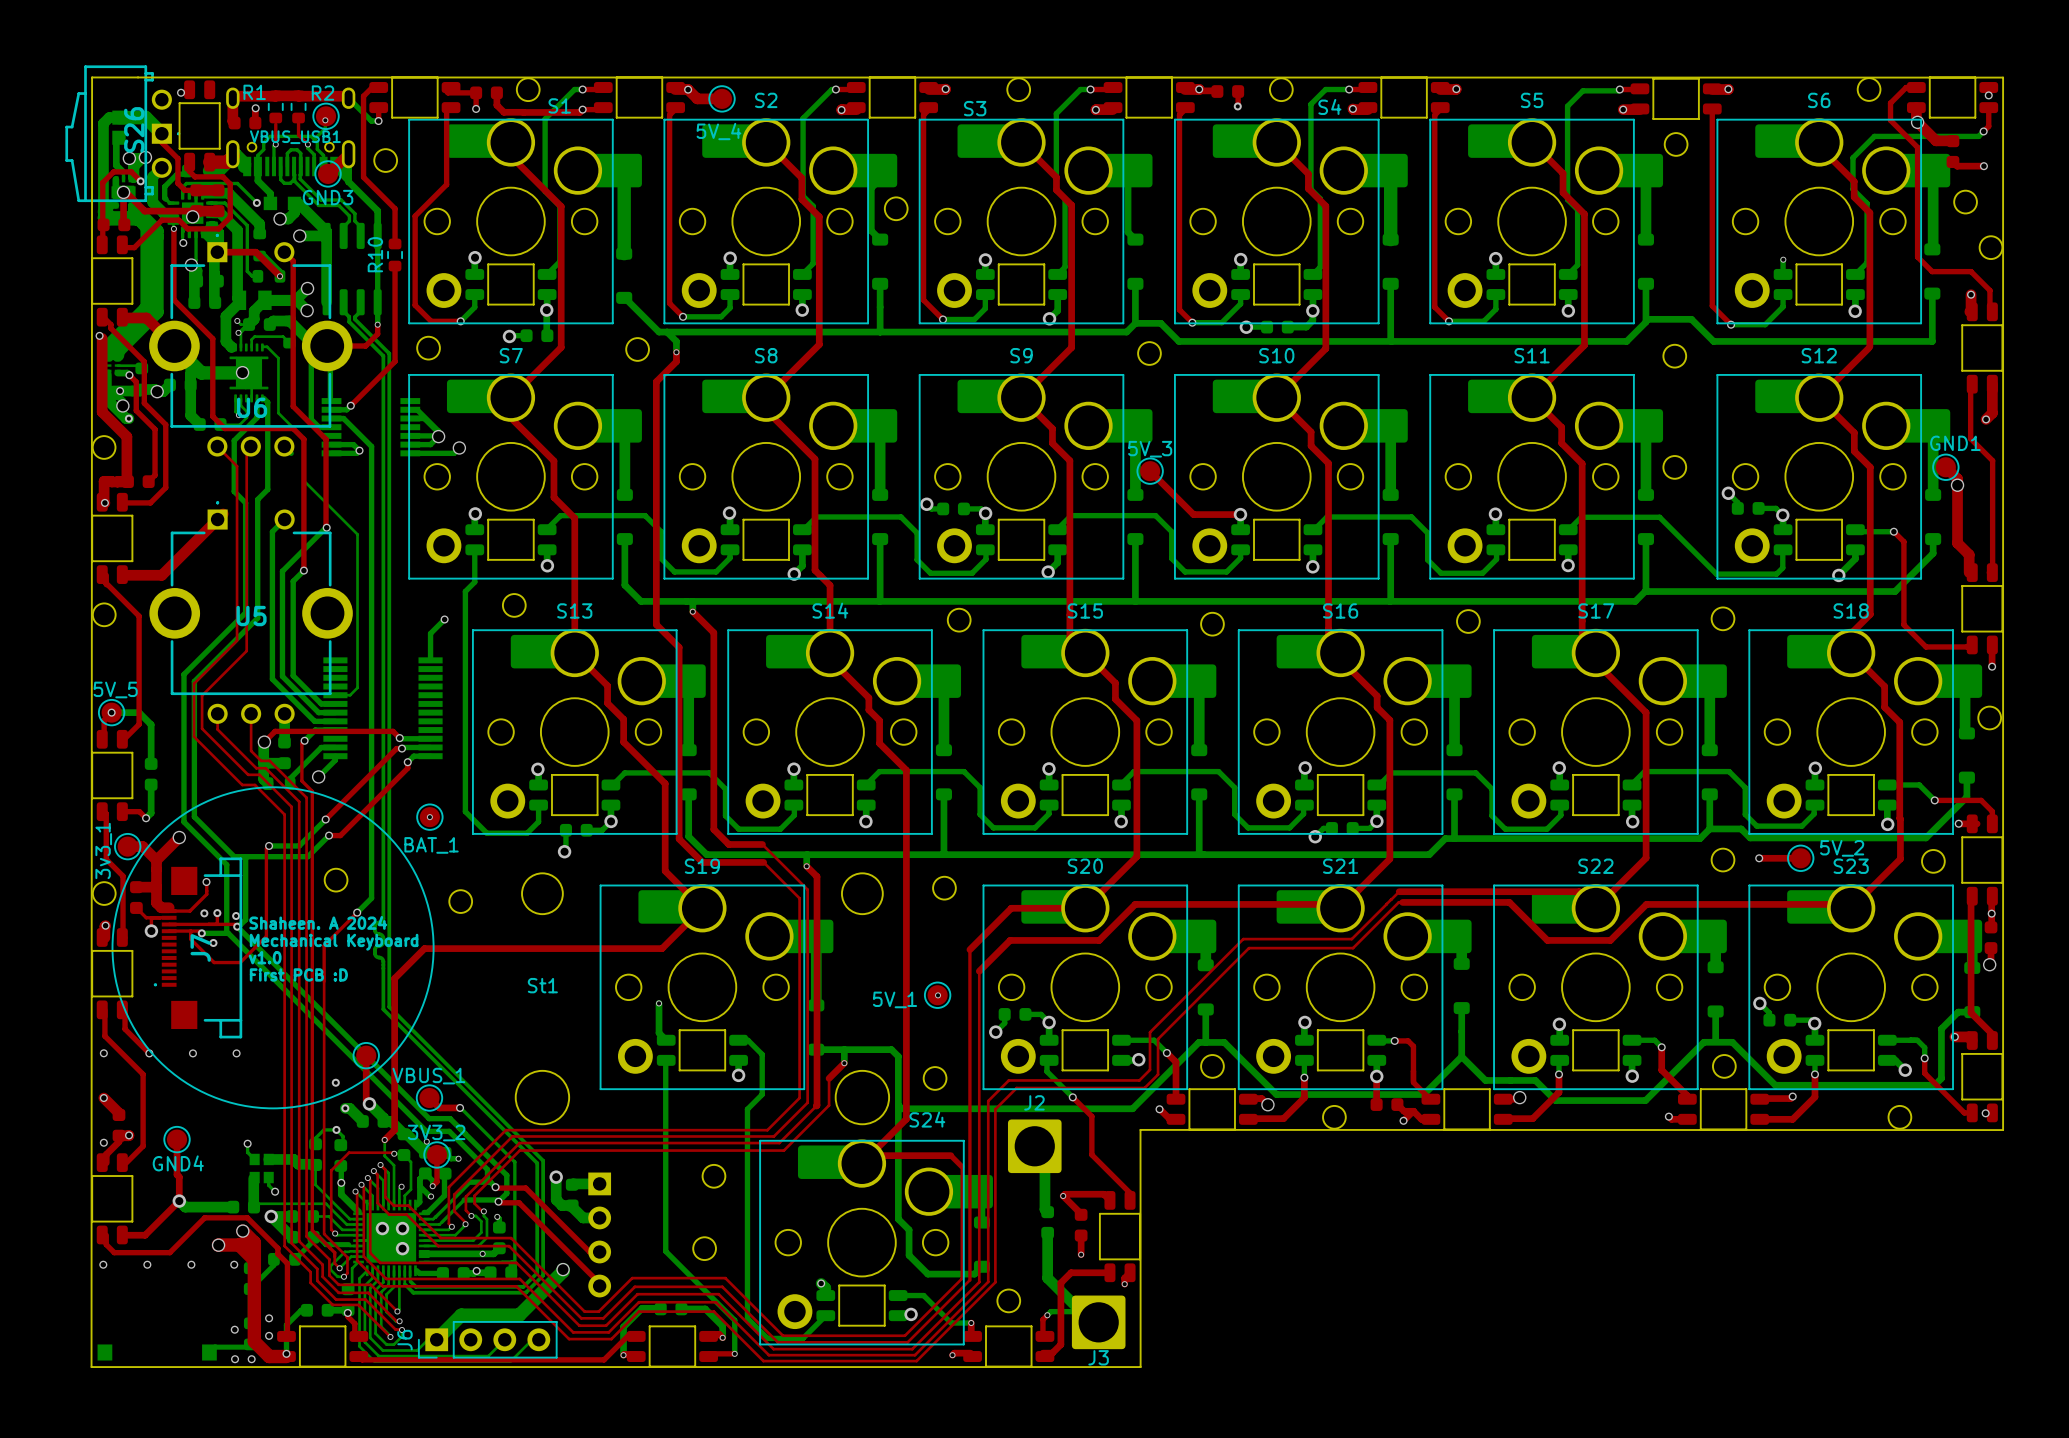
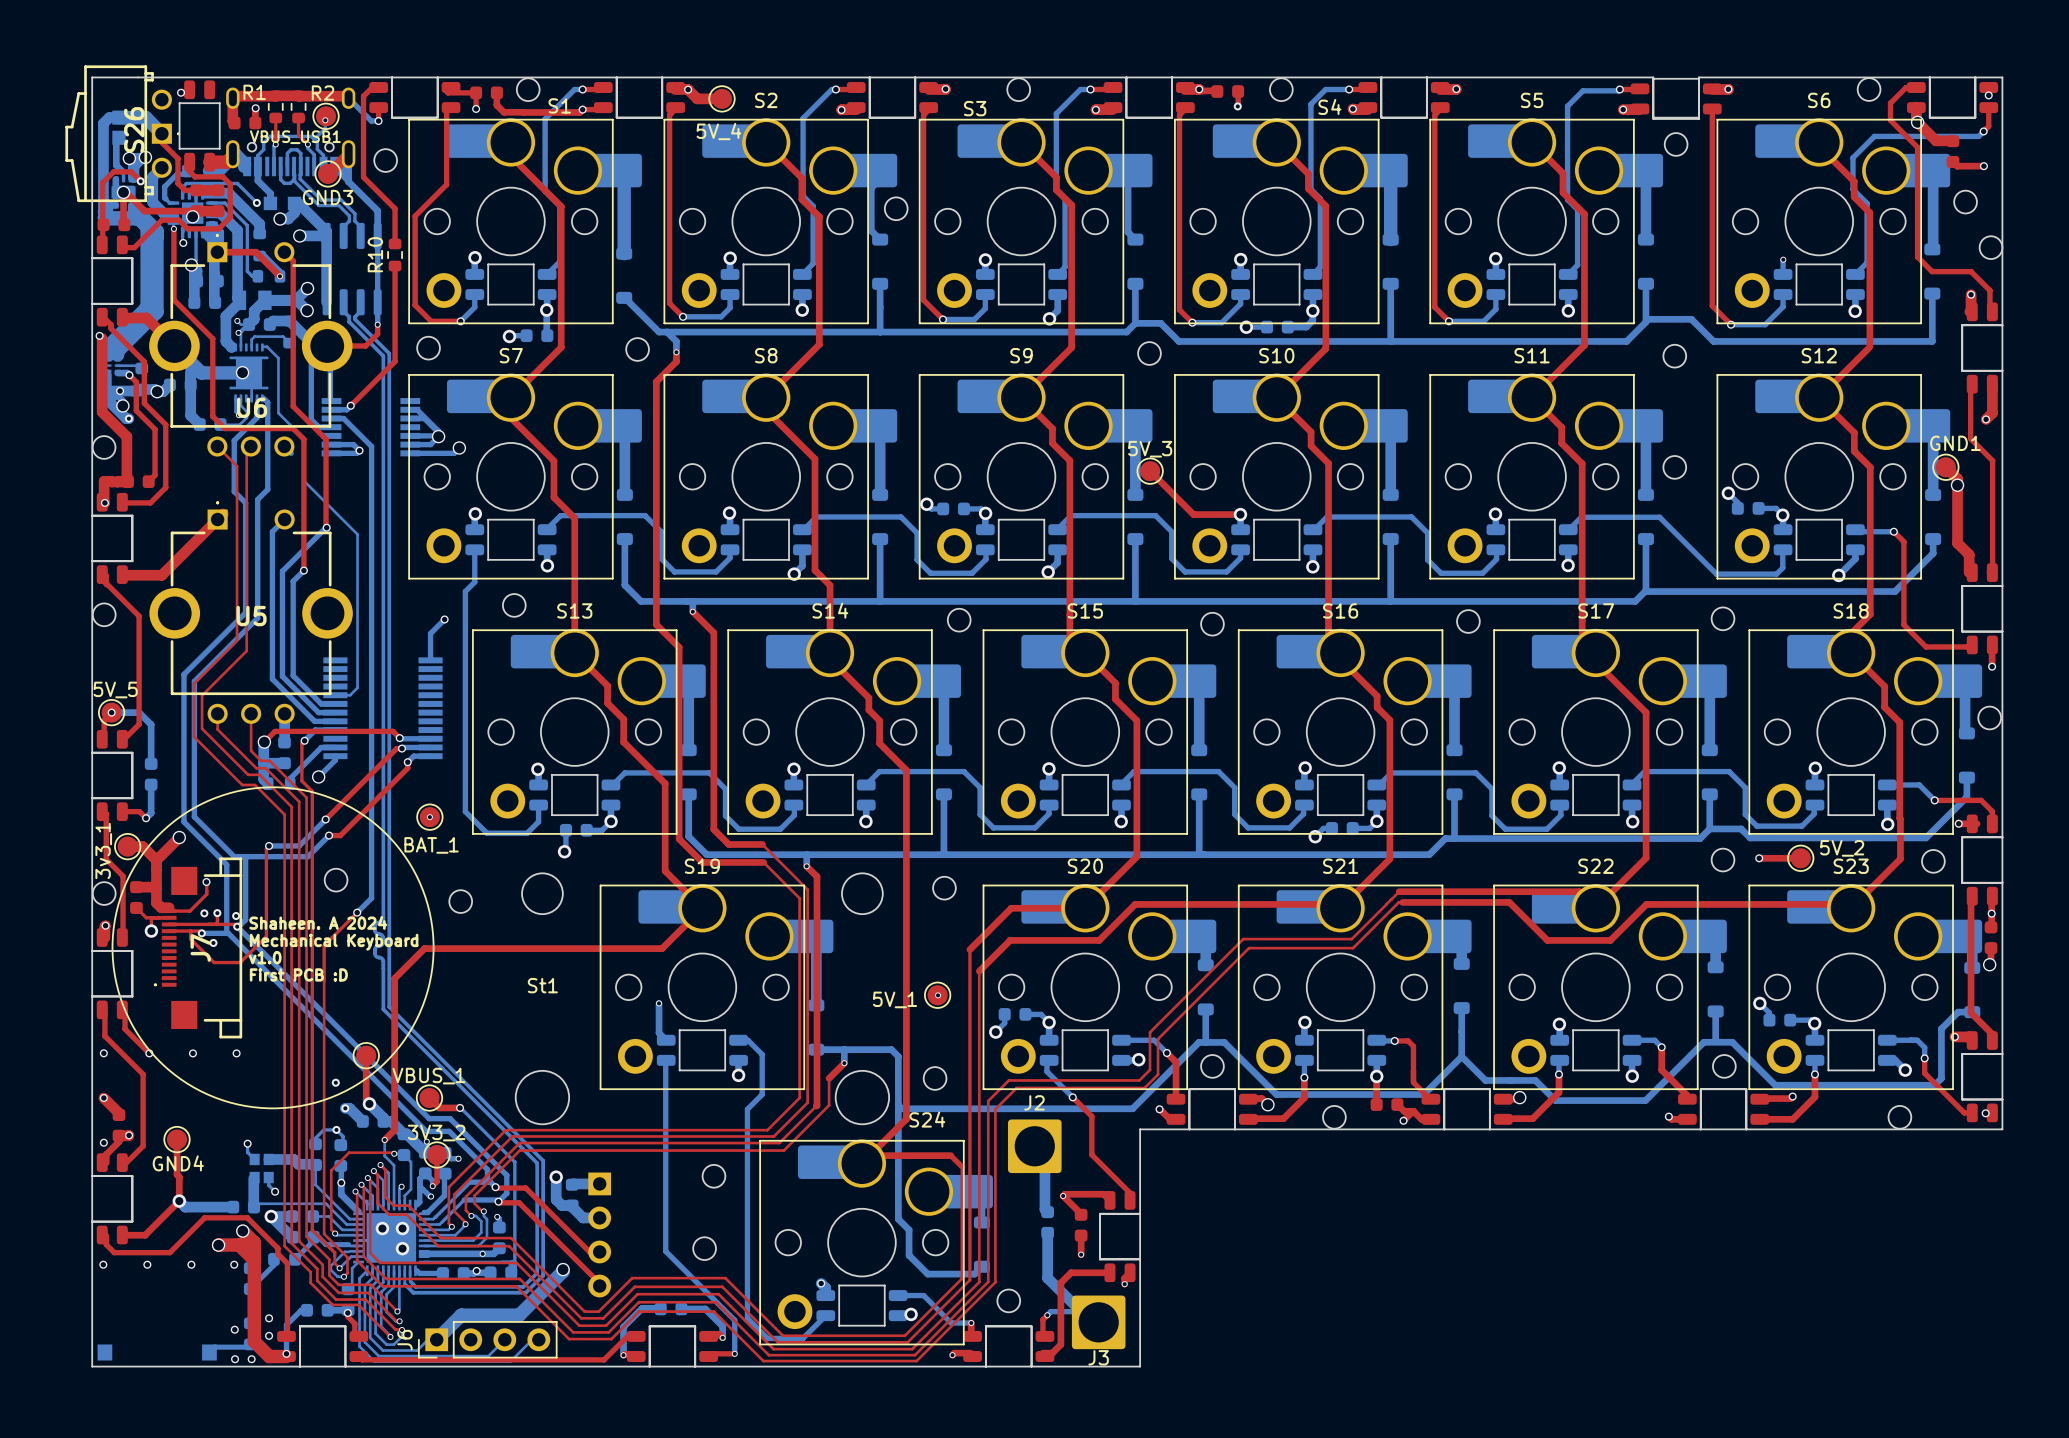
board edge: (92, 77) (91, 1367) (1140, 1367) (1140, 1129) (2003, 1130) (2003, 77) (138, 77) -> (92, 77) (92, 258) (132, 258) (132, 303) (92, 303) (92, 515) (132, 515) (132, 561) (92, 561) (92, 752) (132, 752) (132, 798) (92, 798) (92, 950) (132, 950) (132, 996) (92, 996) (92, 1176) (132, 1176) (132, 1221) (92, 1221) (92, 1366) (299, 1366) (299, 1326) (345, 1326) (345, 1366) (649, 1366) (649, 1326) (695, 1326) (695, 1366) (986, 1366) (986, 1326) (1031, 1326) (1031, 1366) (1140, 1366) (1140, 1259) (1099, 1259) (1099, 1213) (1140, 1213) (1140, 1129) (1189, 1129) (1189, 1089) (1234, 1089) (1234, 1129) (1444, 1129) (1444, 1089) (1489, 1089) (1489, 1129) (1700, 1129) (1700, 1089) (1746, 1089) (1746, 1129) (2002, 1129) (2002, 1099) (1962, 1099) (1962, 1053) (2002, 1053) (2002, 882) (1962, 882) (1962, 837) (2002, 837) (2002, 631) (1962, 631) (1962, 585) (2002, 585) (2002, 370) (1962, 370) (1962, 325) (2002, 325) (2002, 77) (1975, 77) (1975, 117) (1929, 117) (1929, 77) (1698, 77) (1698, 117) (1653, 117) (1653, 77) (1426, 77) (1426, 117) (1381, 117) (1381, 77) (1171, 77) (1171, 117) (1126, 117) (1126, 77) (915, 77) (915, 117) (869, 117) (869, 77) (662, 77) (662, 117) (616, 117) (616, 77) (437, 77) (437, 117) (392, 117) (392, 77) (138, 77)

